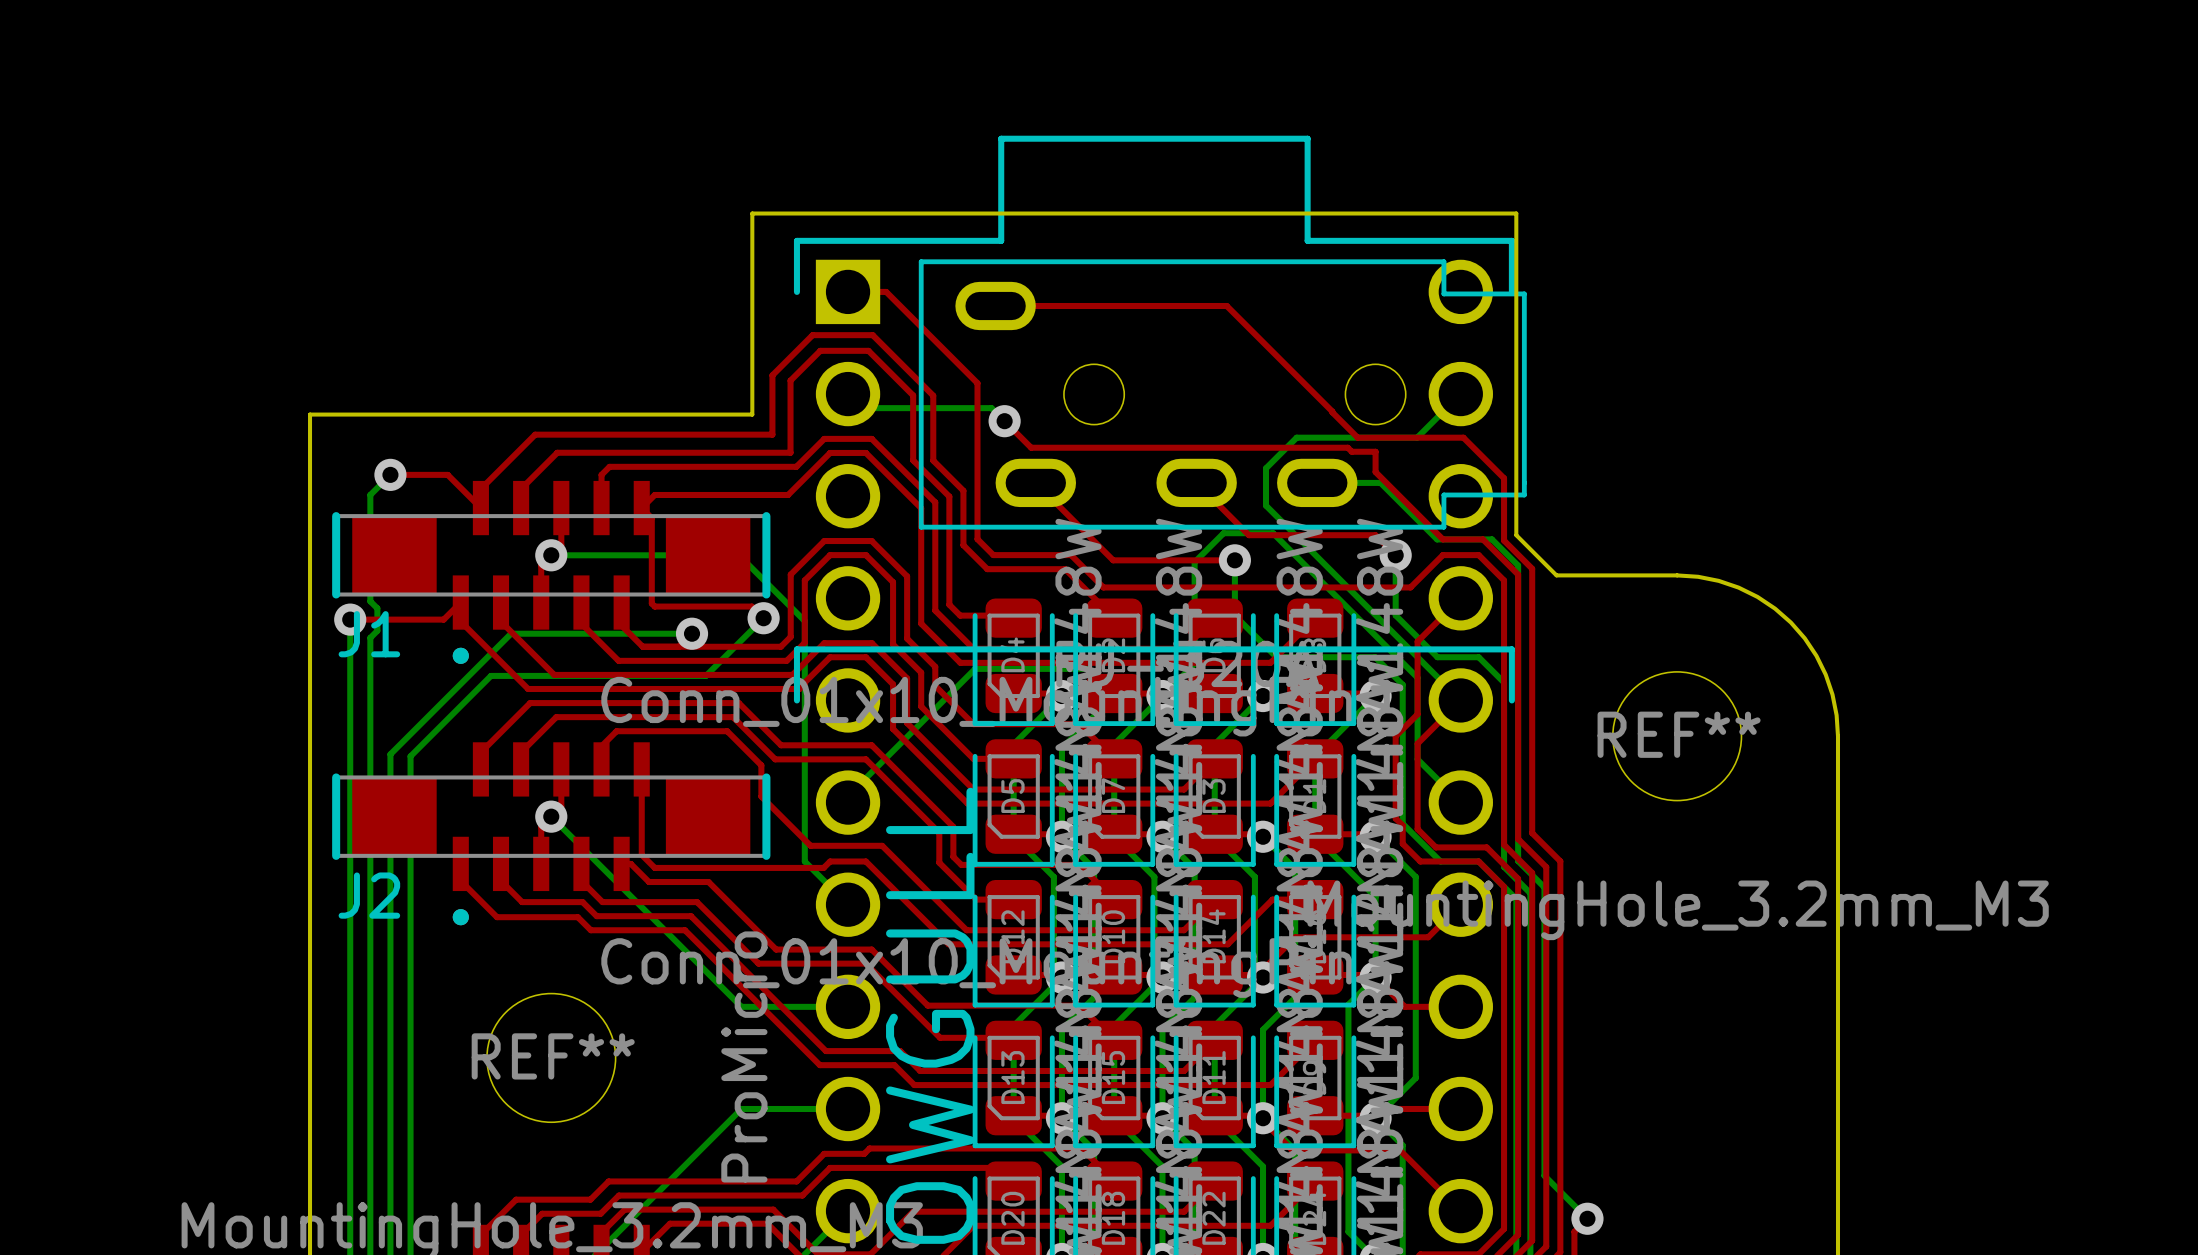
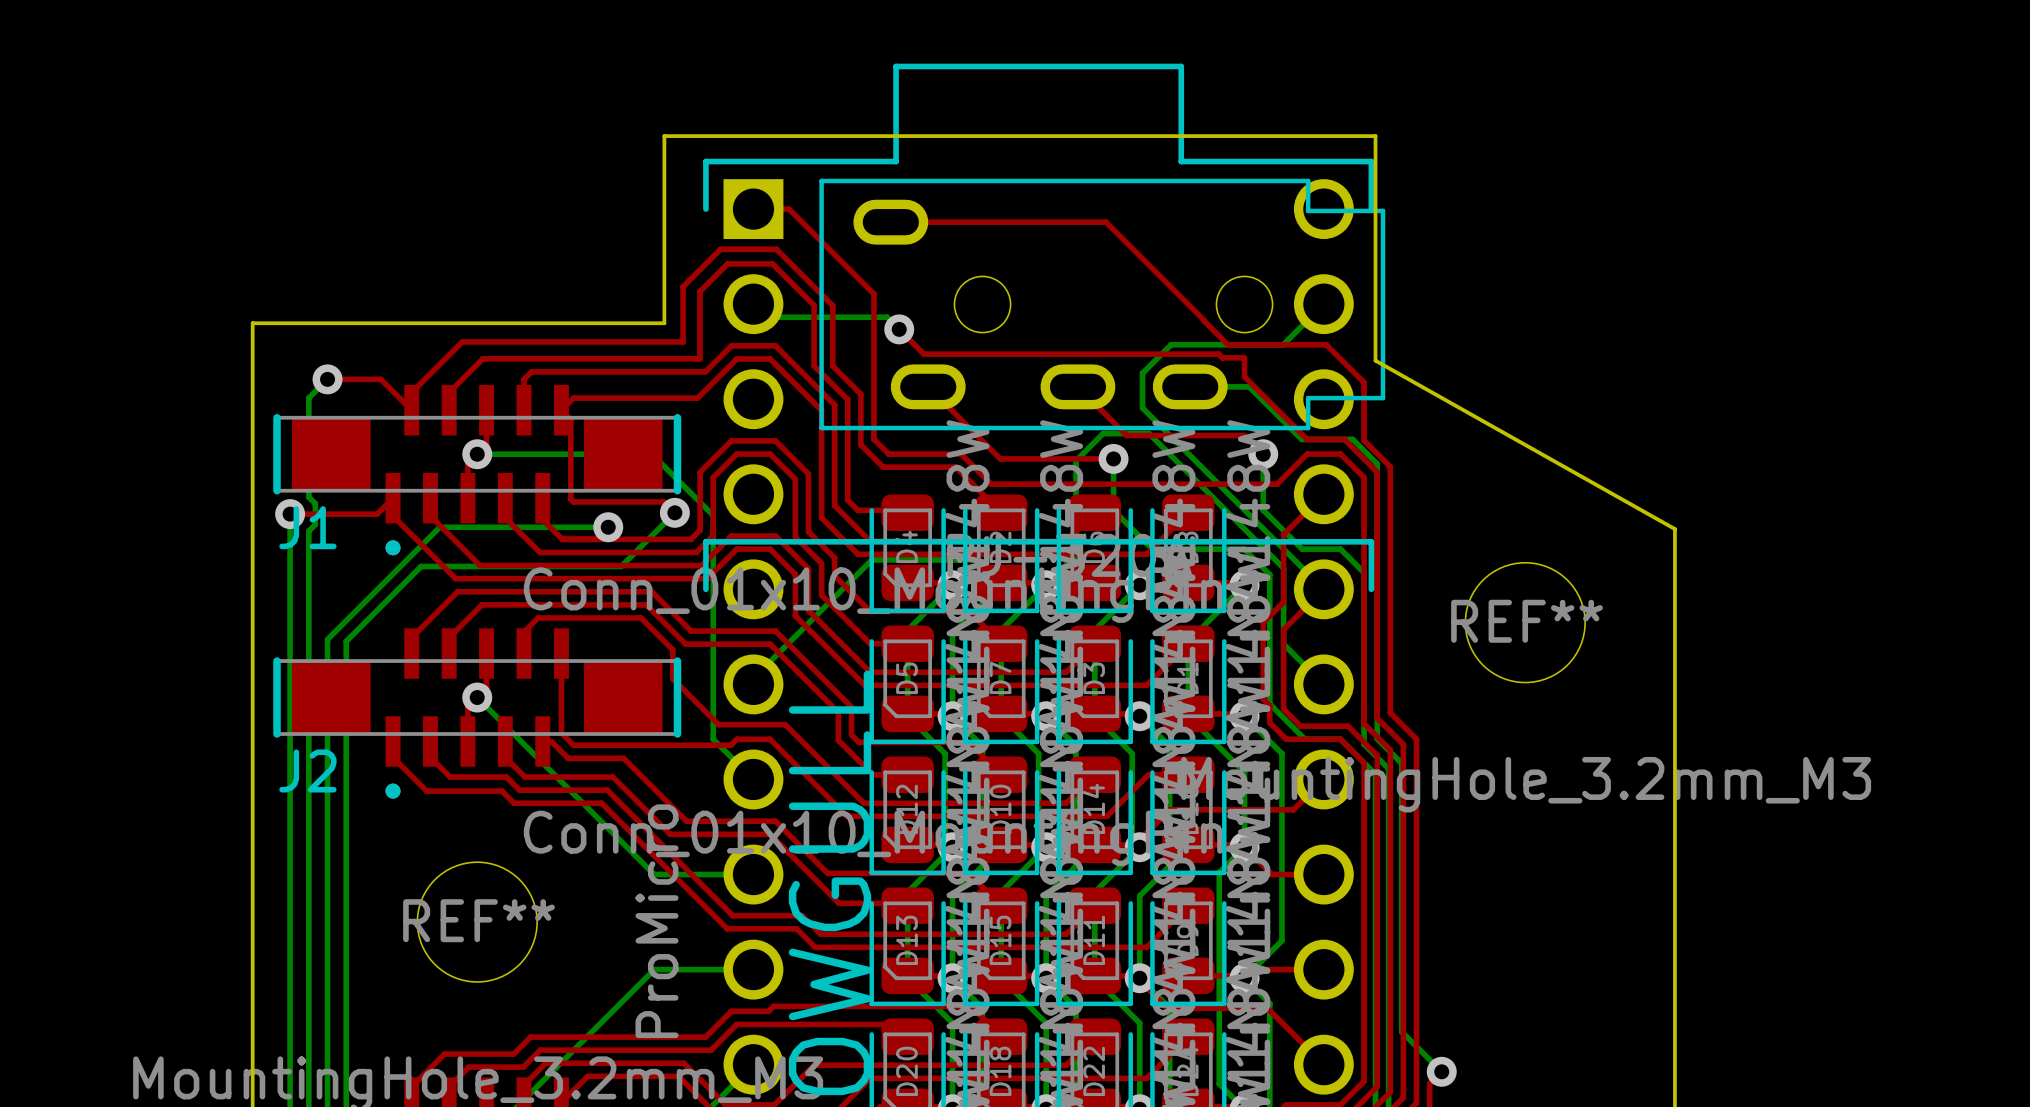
board edge: (1516, 454) (1516, 535) (1556, 575) (1698, 576) (1738, 587) (1757, 596) (1790, 622) (1816, 655) (1832, 694) (1837, 736) -> (1375, 360) (1674, 529) (1674, 622)

